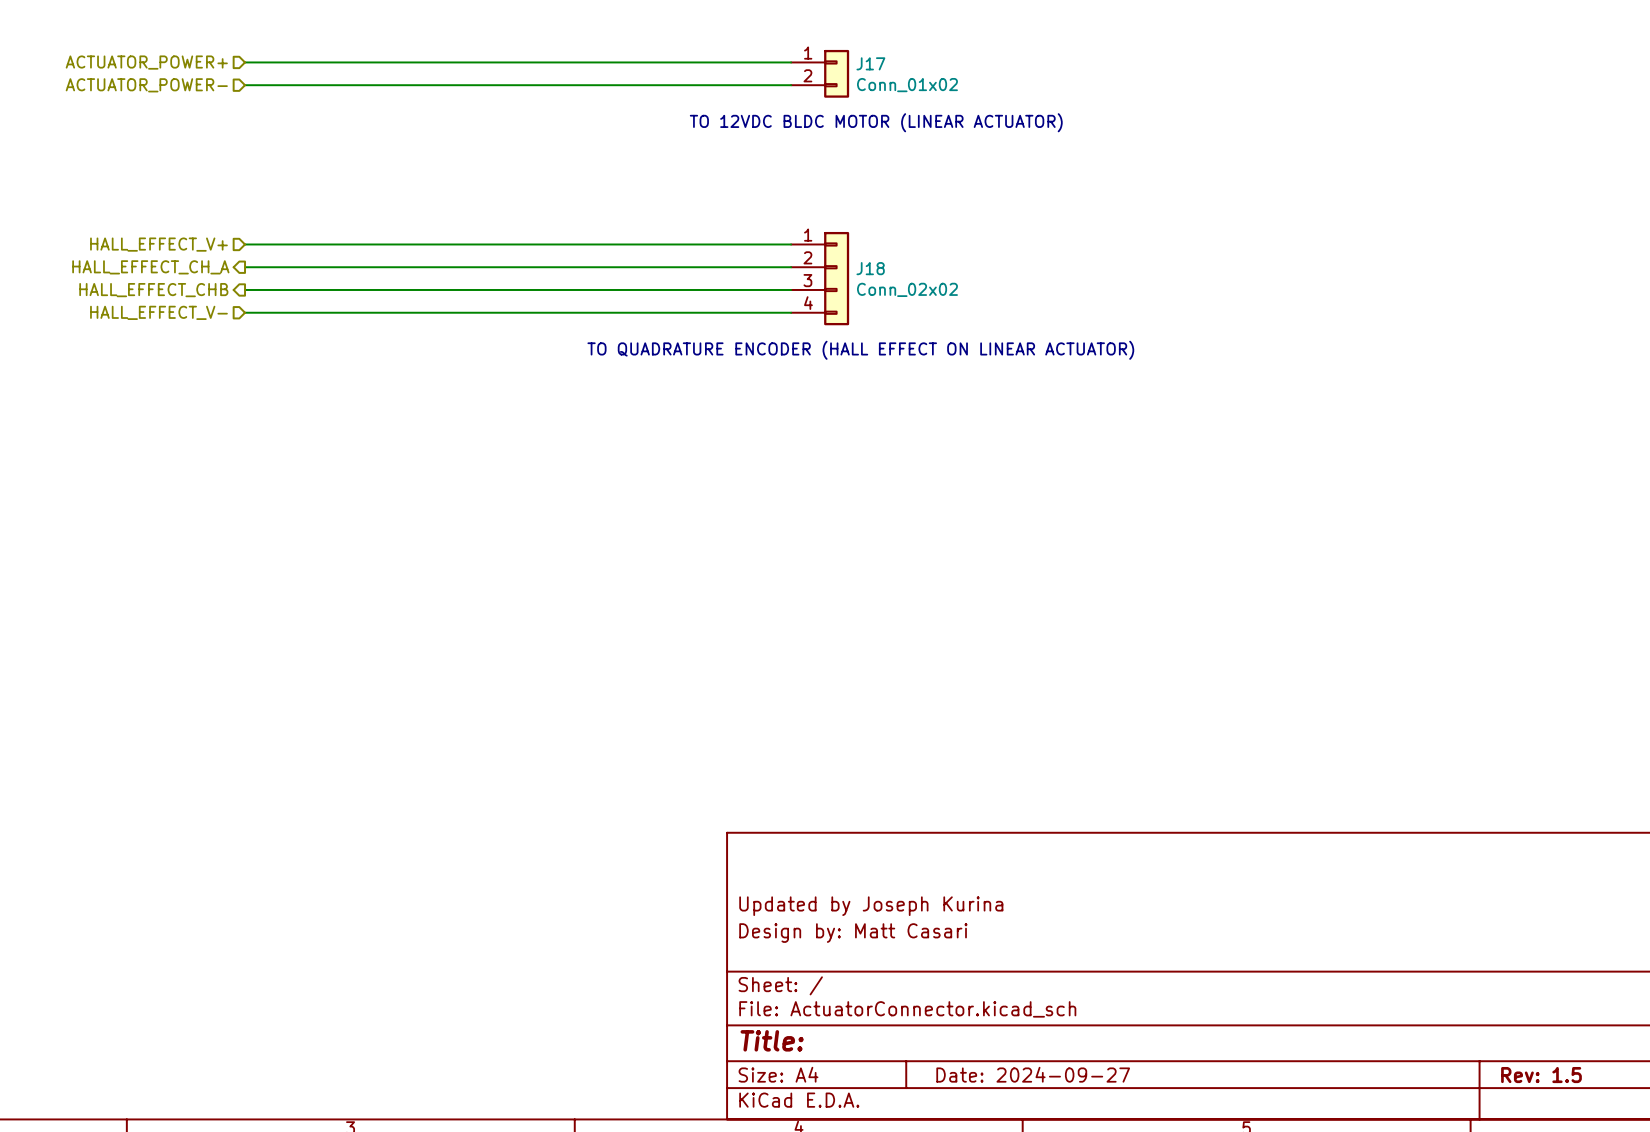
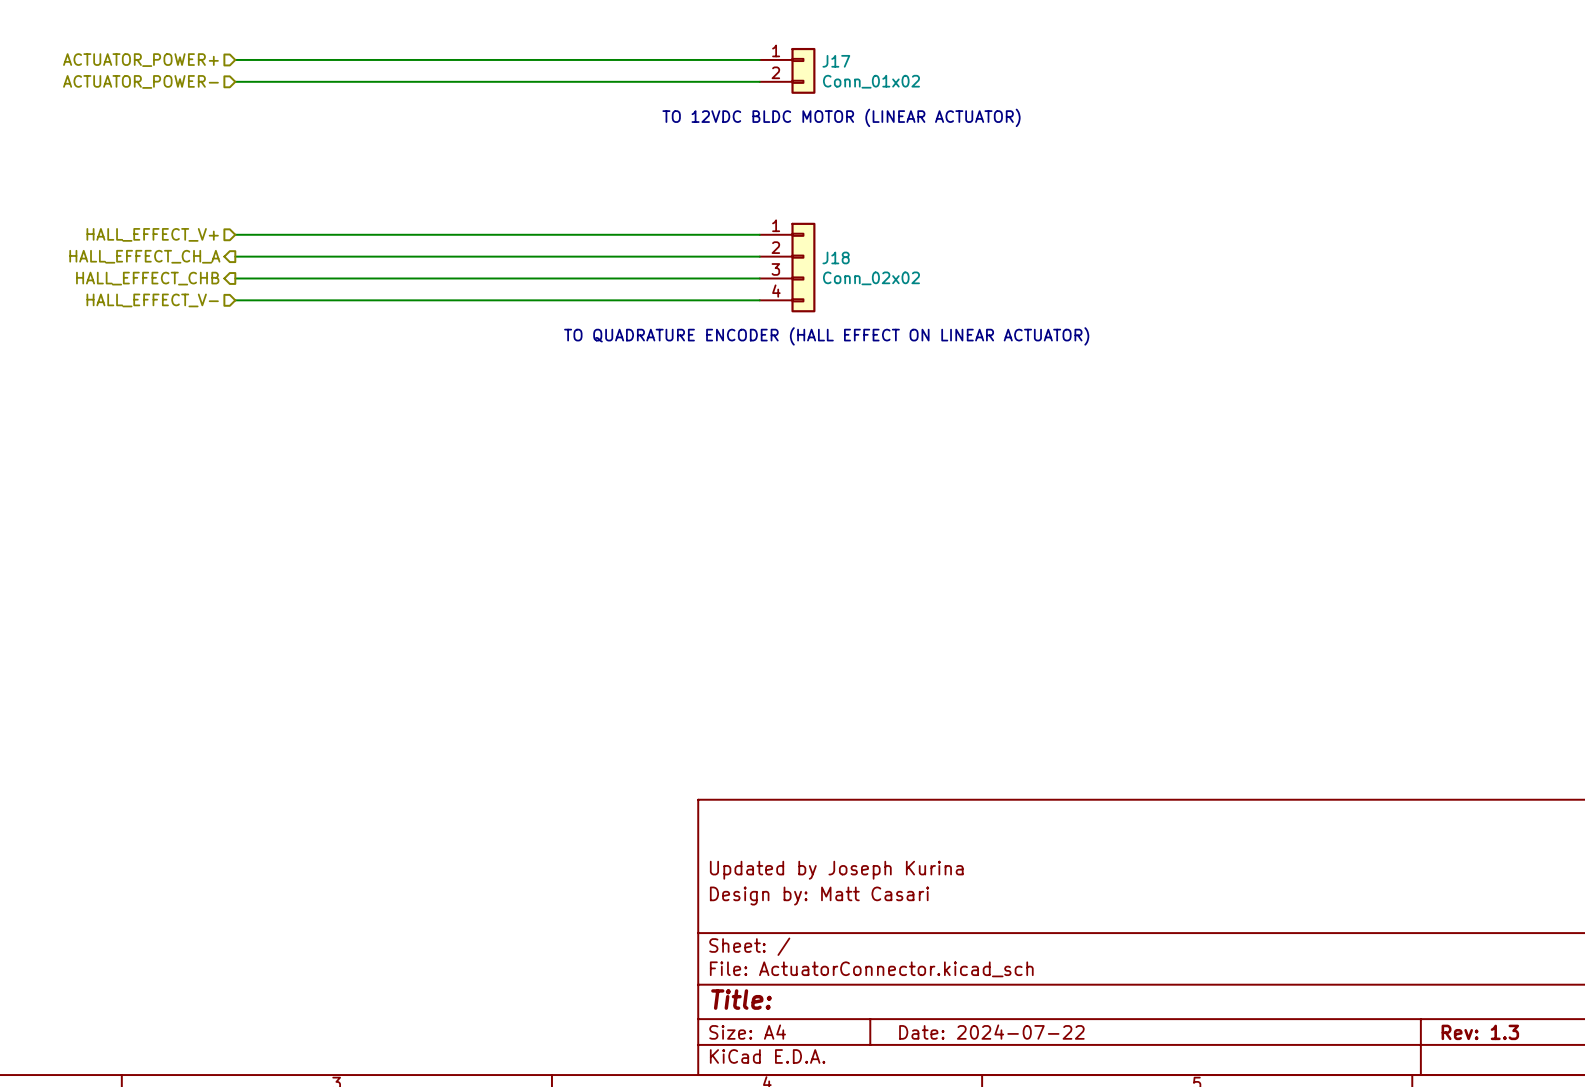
title block: Date: 2024-09-27 (1033, 1074) -> Date: 2024-07-22 (991, 1032)
title block: Rev: 1.5 (1541, 1075) -> Rev: 1.3 (1480, 1032)

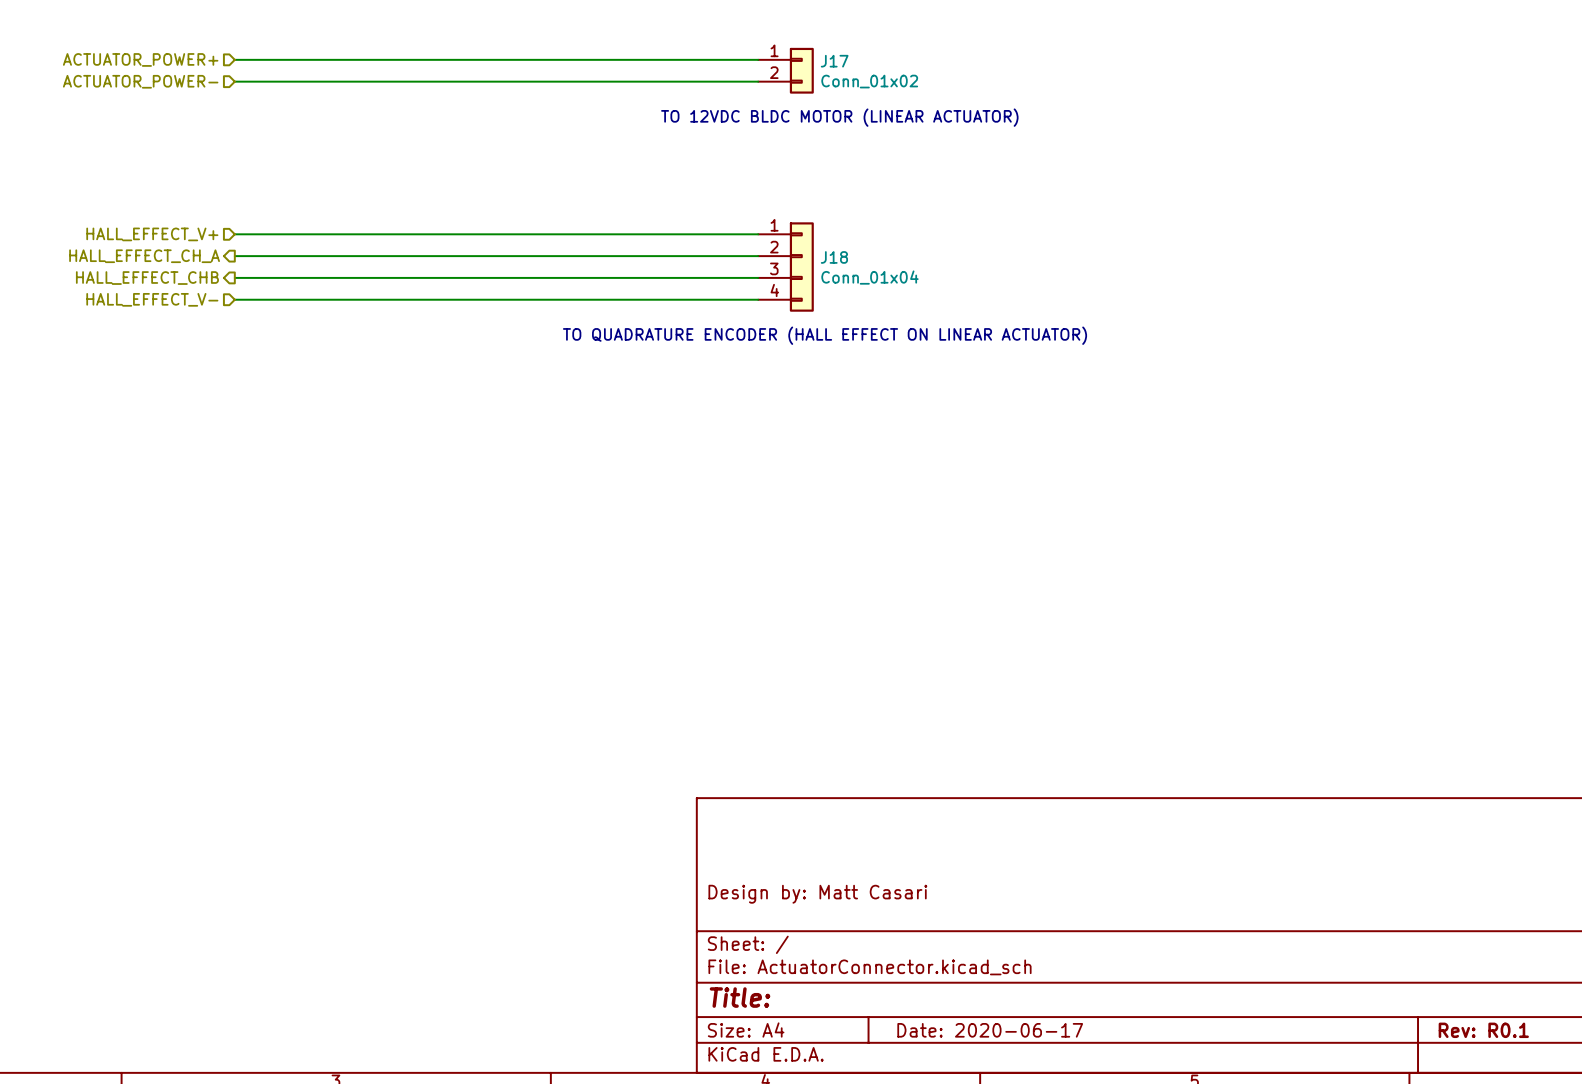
J18 value: Conn_02x02 (871, 278) -> Conn_01x04 (869, 277)
title block: Updated by Joseph Kurina (836, 870) -> none
title block: Date: 2024-07-22 (991, 1032) -> Date: 2020-06-17 (990, 1030)
title block: Rev: 1.3 (1480, 1032) -> Rev: R0.1 (1483, 1030)

